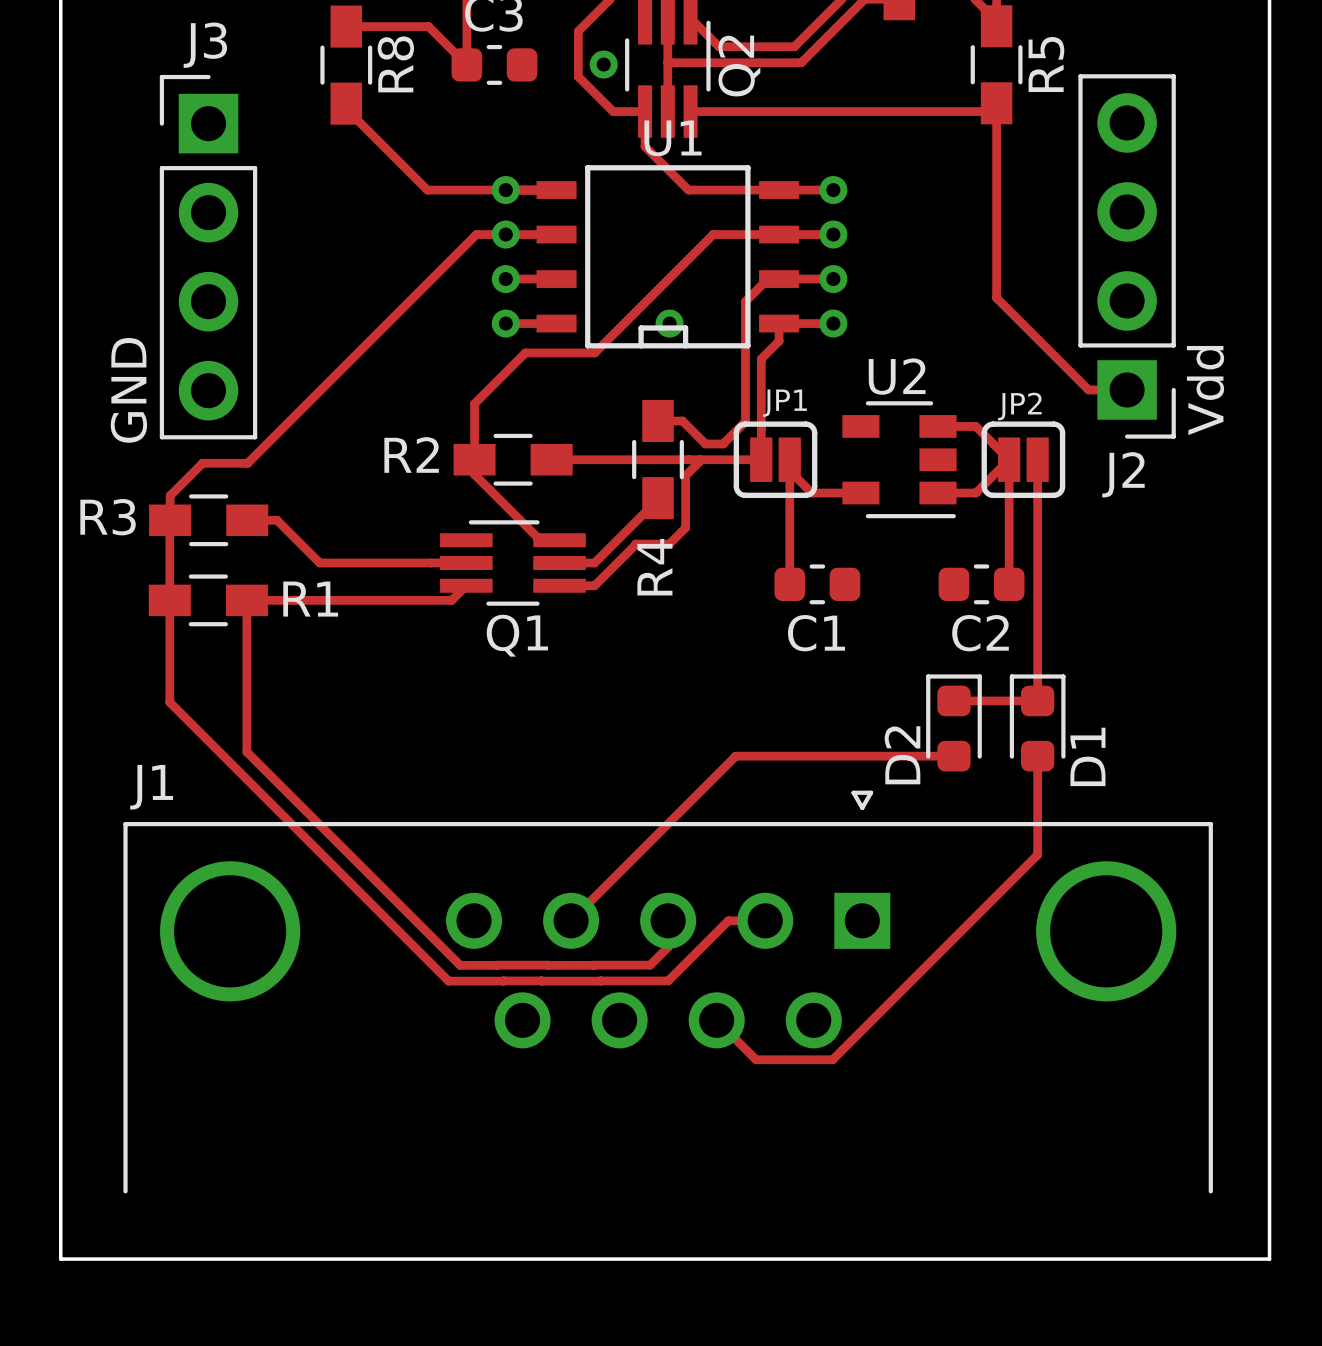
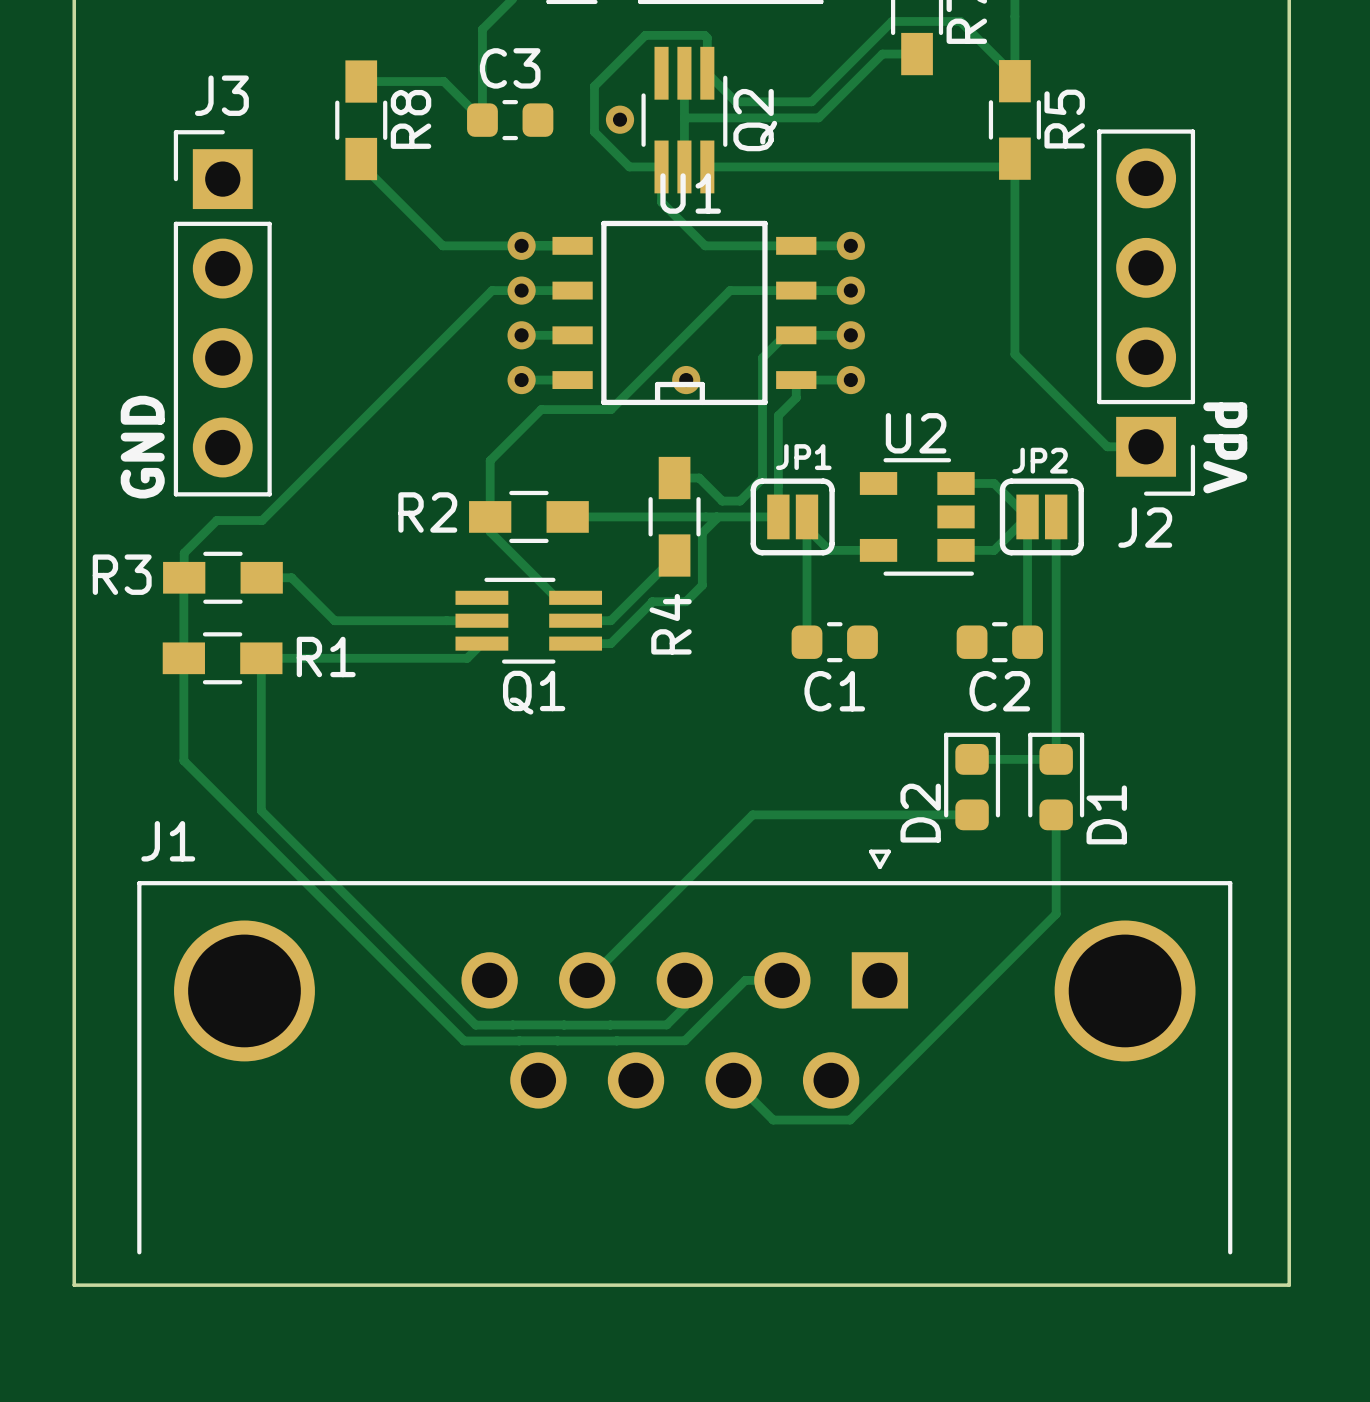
board edge: (60, 1224) (60, 1259) (1269, 1259) (1269, 1224) -> (74, 1285) (1289, 1285)

